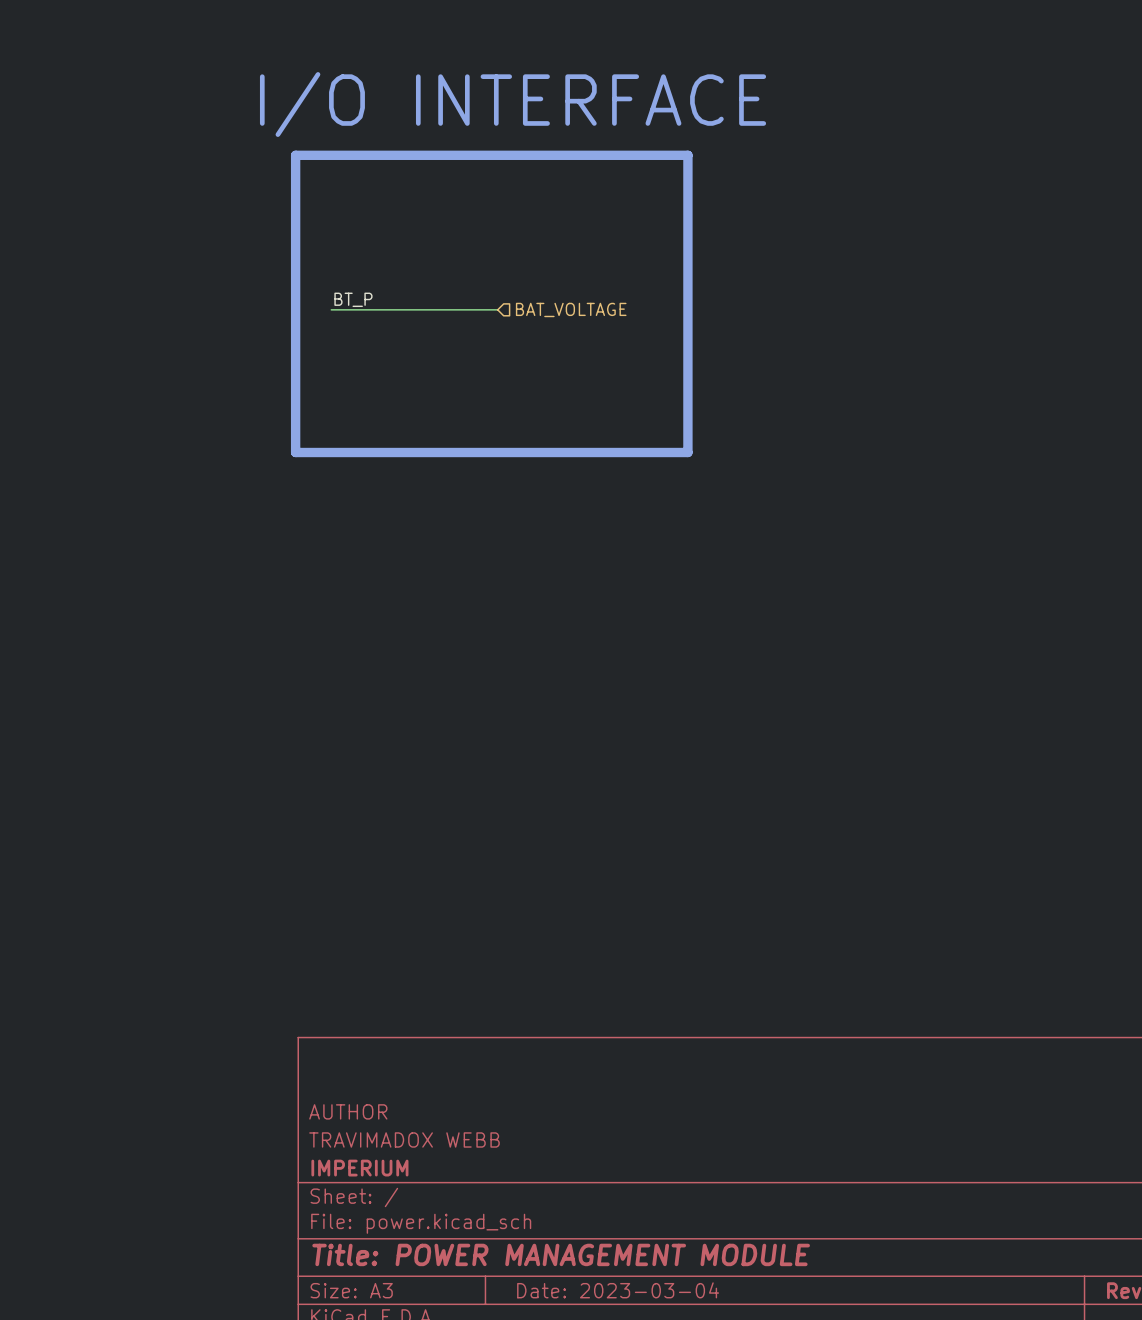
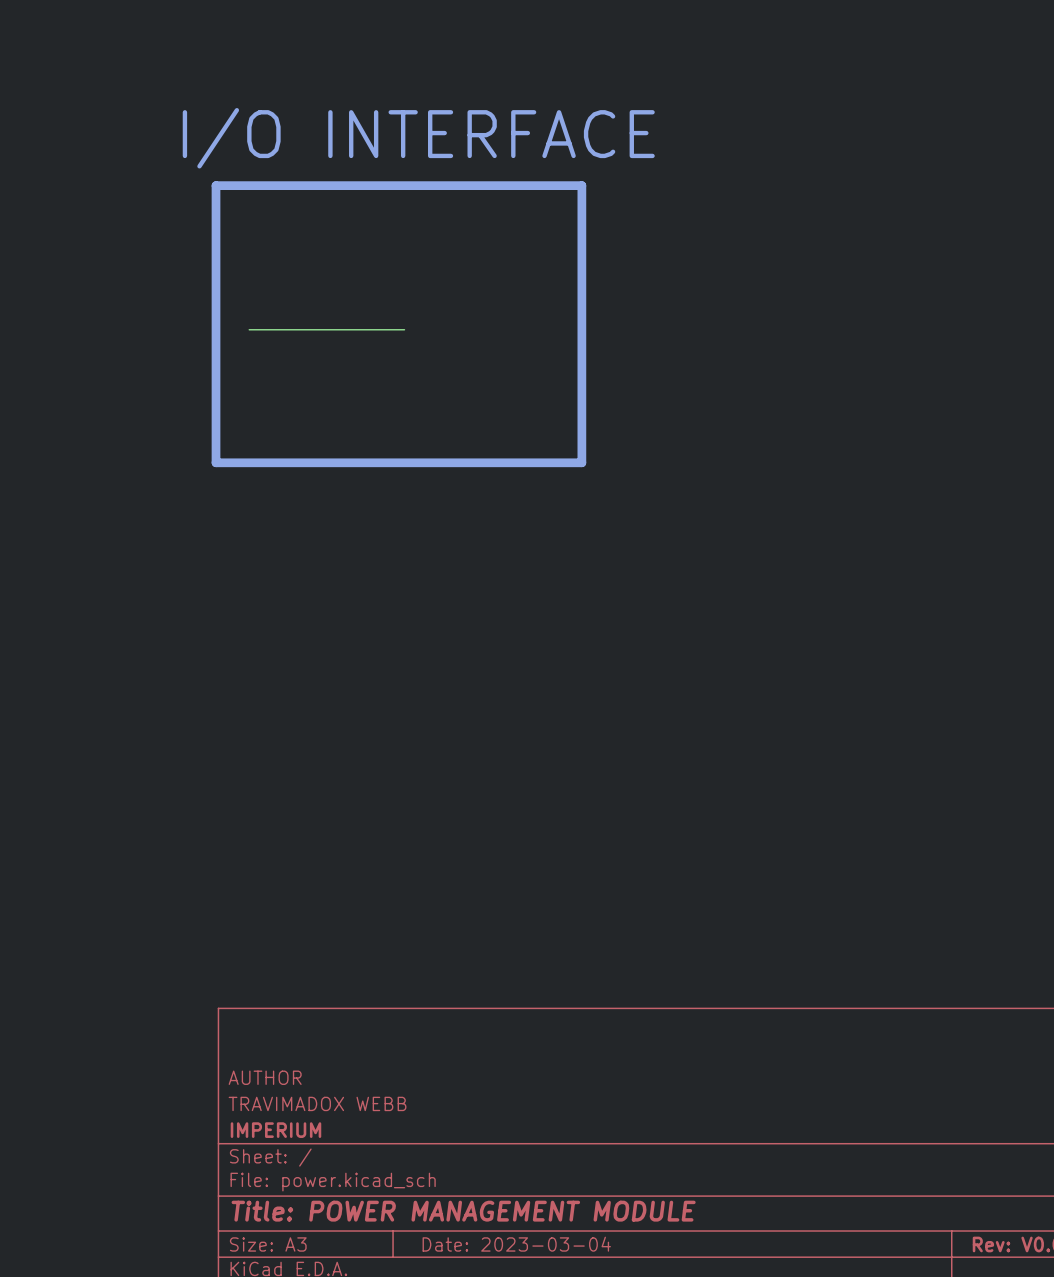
label: BT_P (353, 299) -> none
hierarchical label: BAT_VOLTAGE (571, 309) -> none

